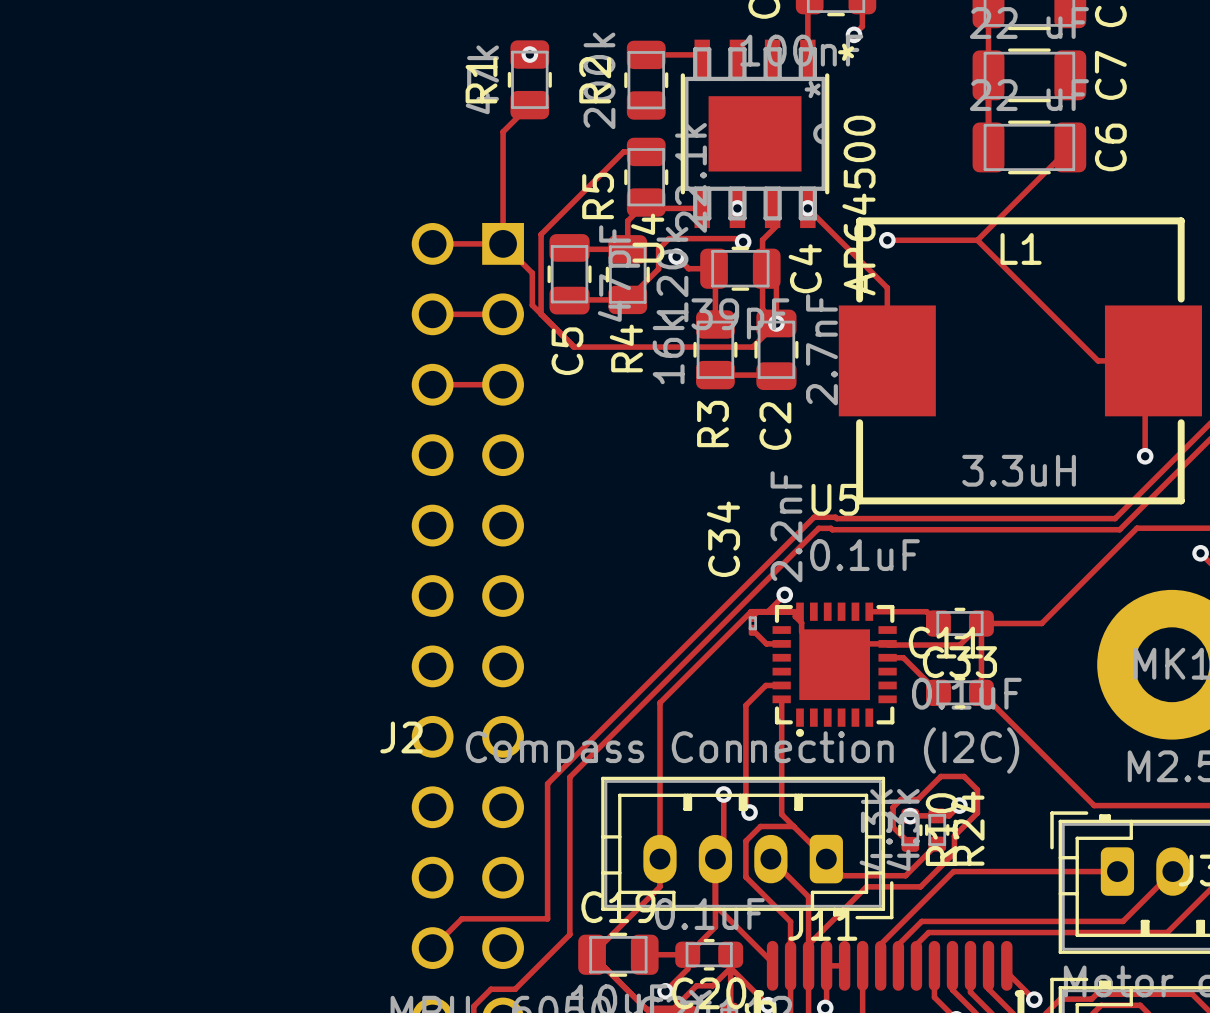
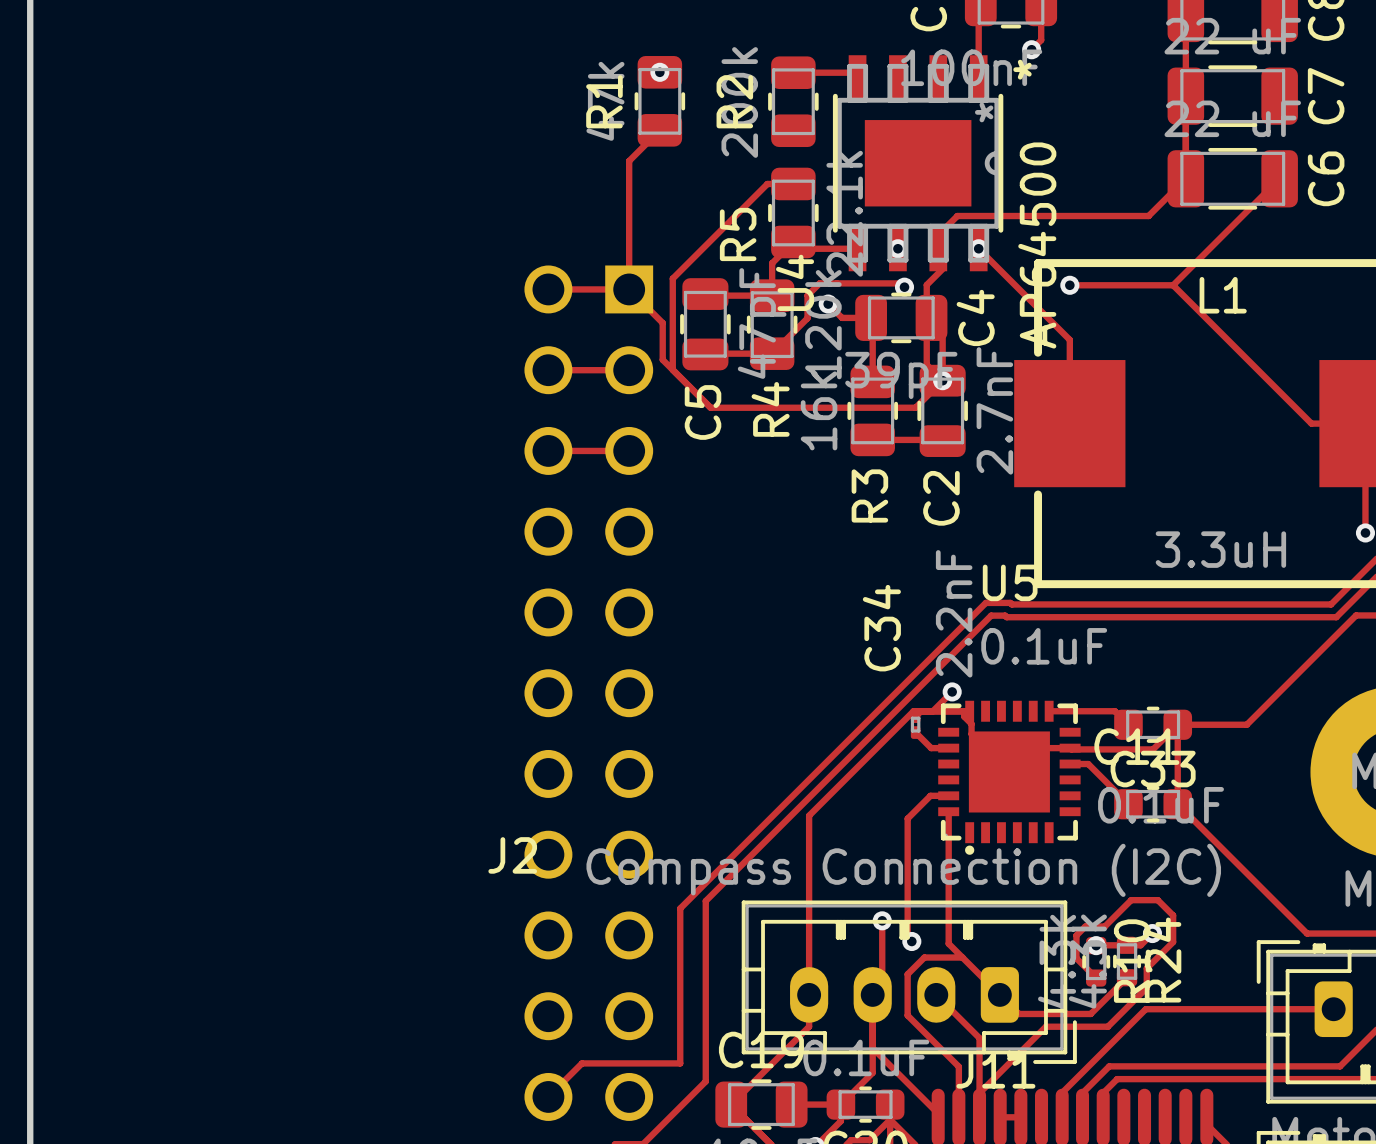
track: none -> (1185, 178) (1148, 216) (957, 216) (938, 235) (938, 248)

